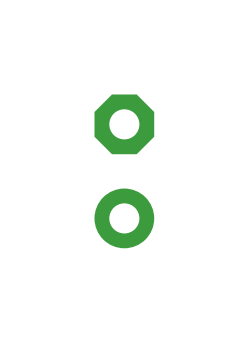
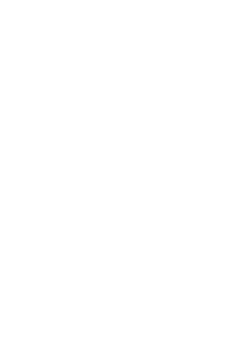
part: (124, 171) -> none

